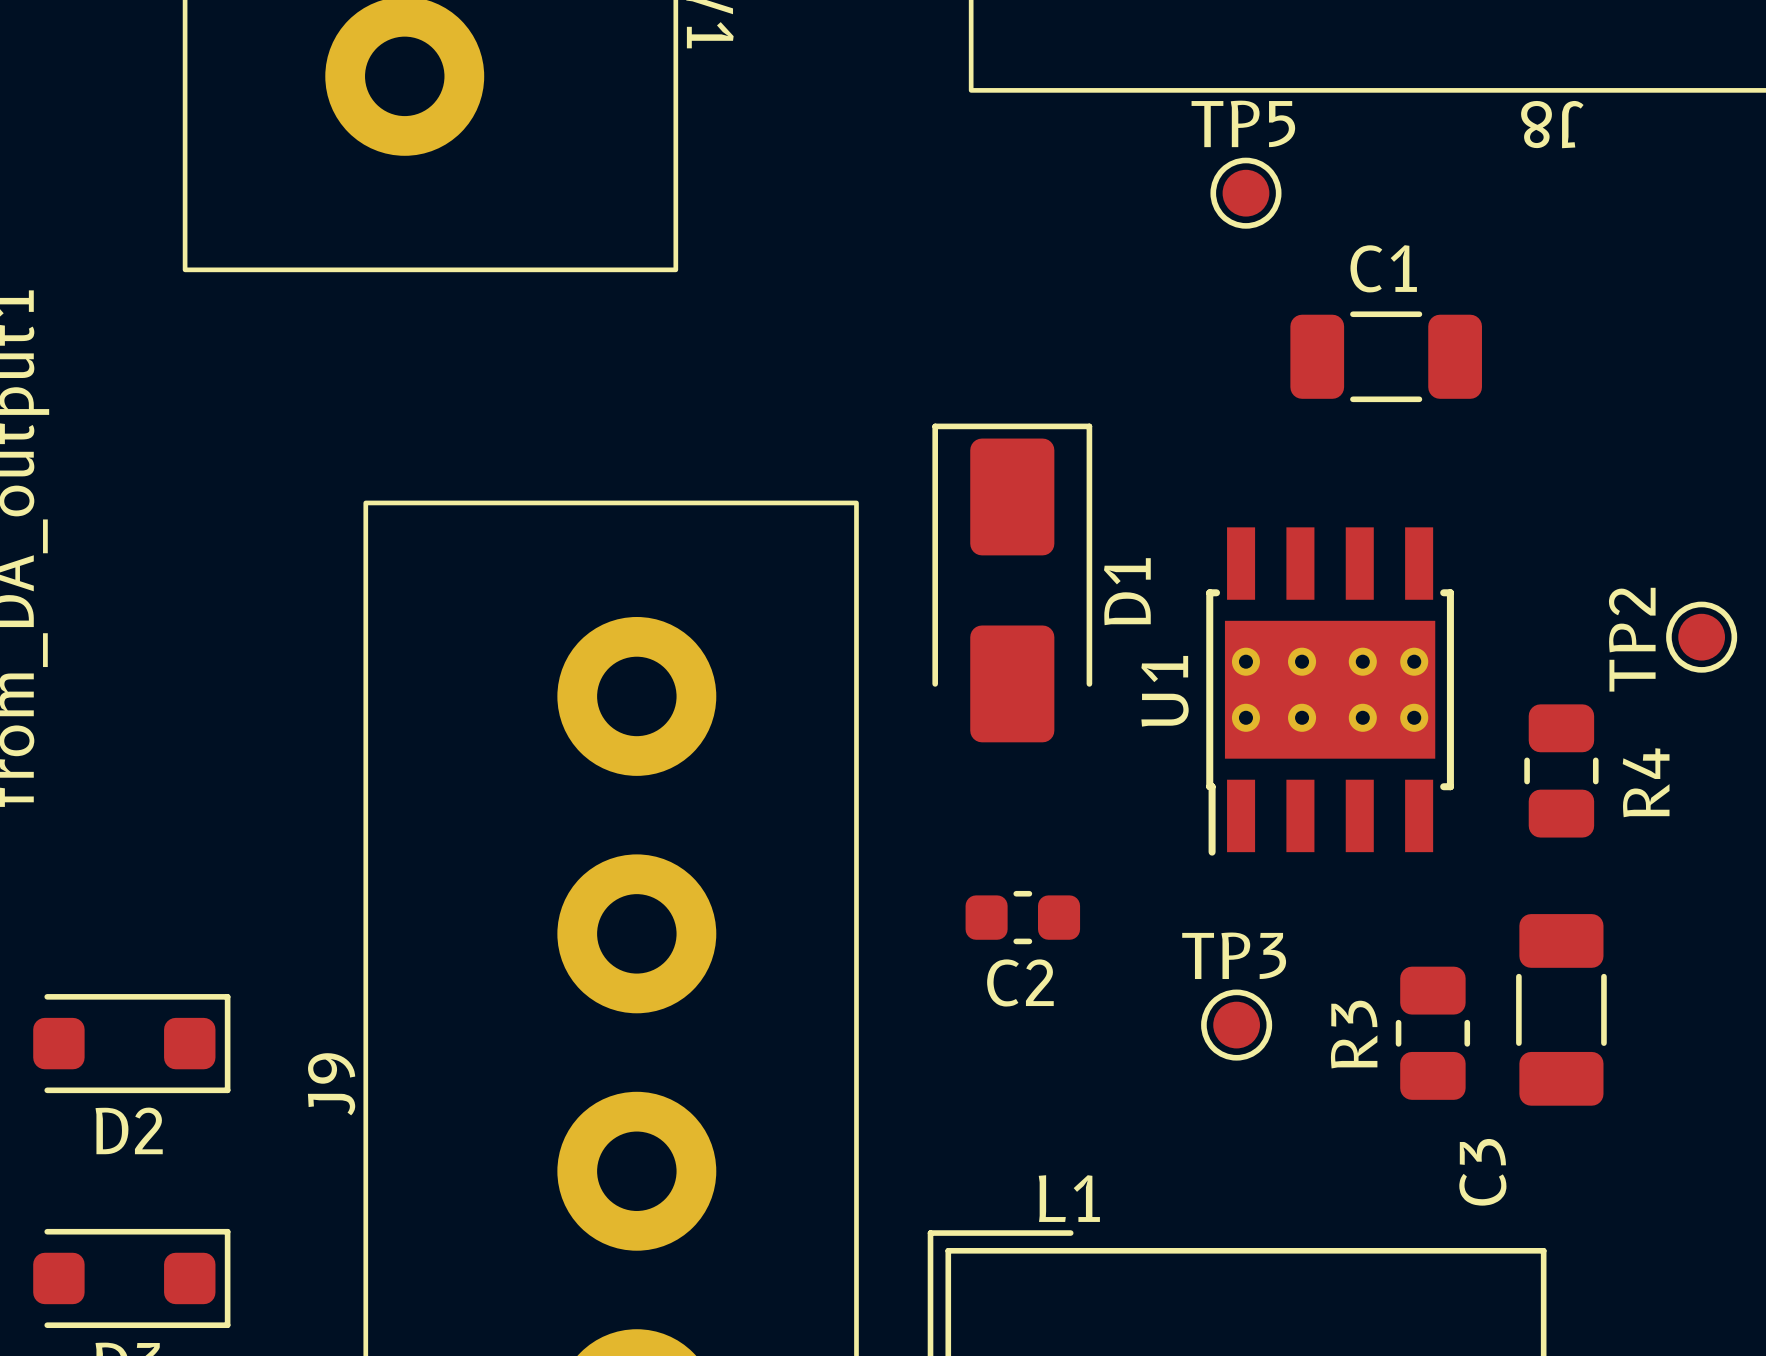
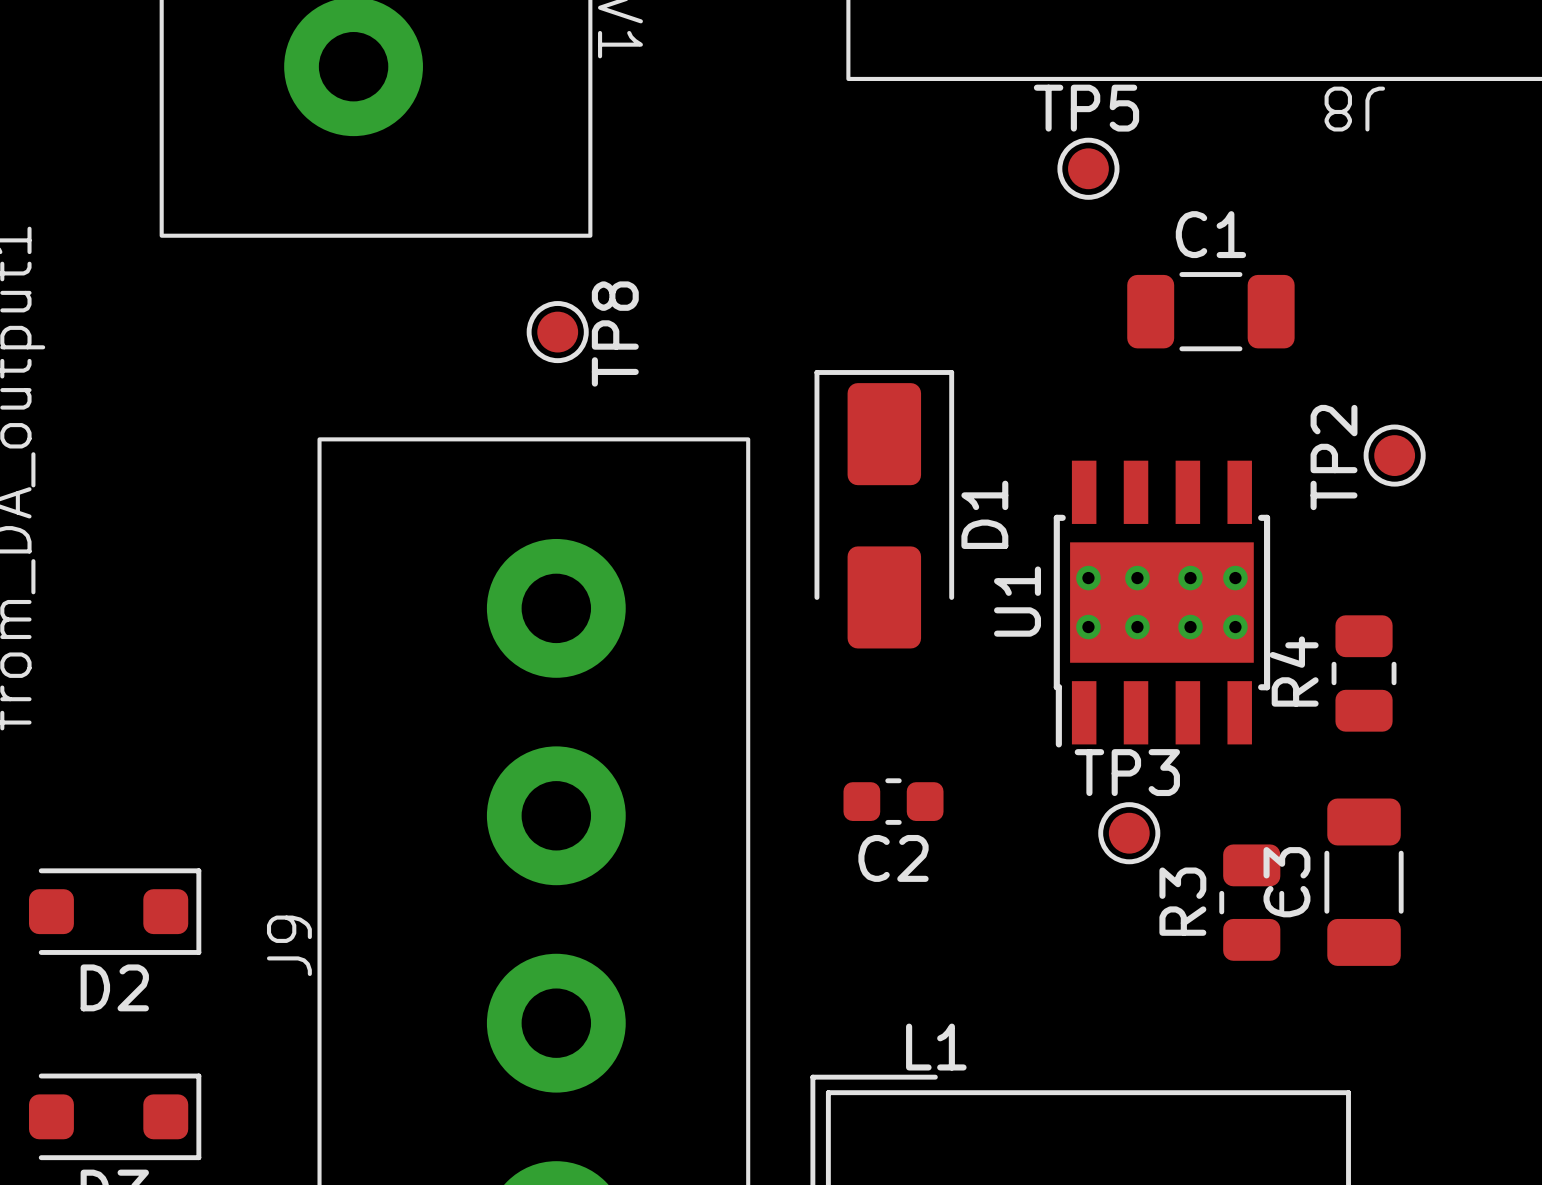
TP8: none -> (557, 332)
TP2 position: (1701, 637) -> (1394, 455)
R4 name position: R4 (1646, 782) -> R4 (1294, 671)
TP3 position: (1236, 1025) -> (1129, 833)
C3 name position: C3 (1482, 1172) -> C3 (1286, 882)

